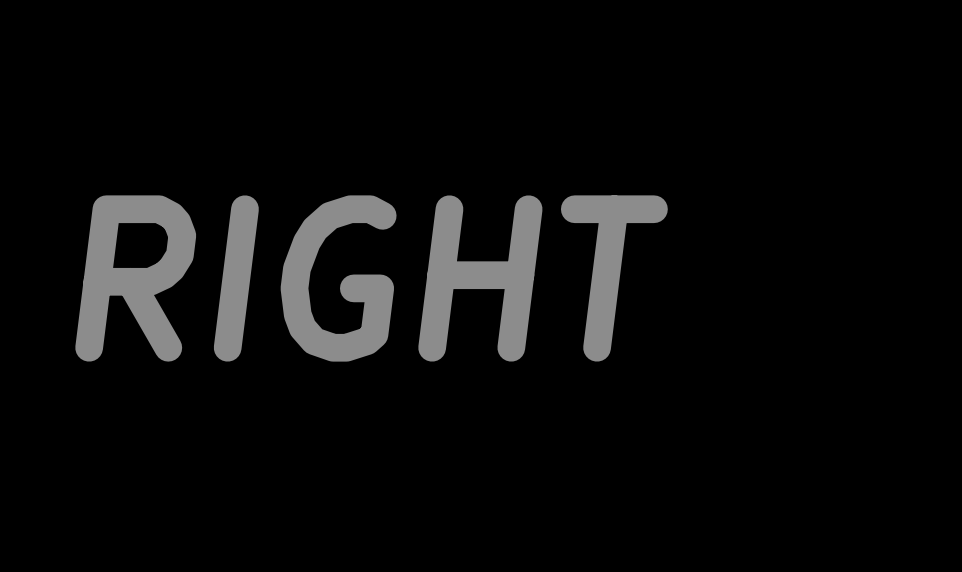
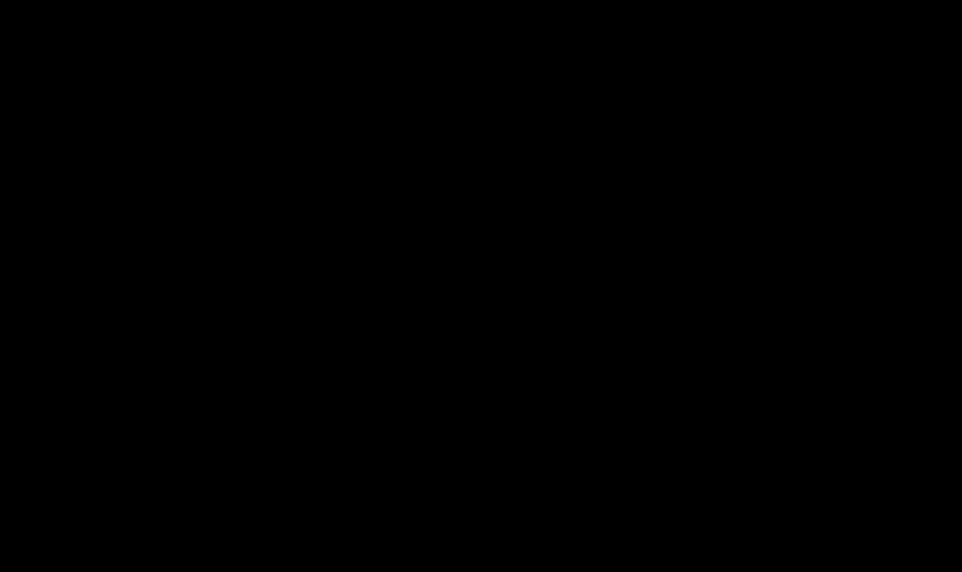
text: RIGHT (371, 278) -> none

